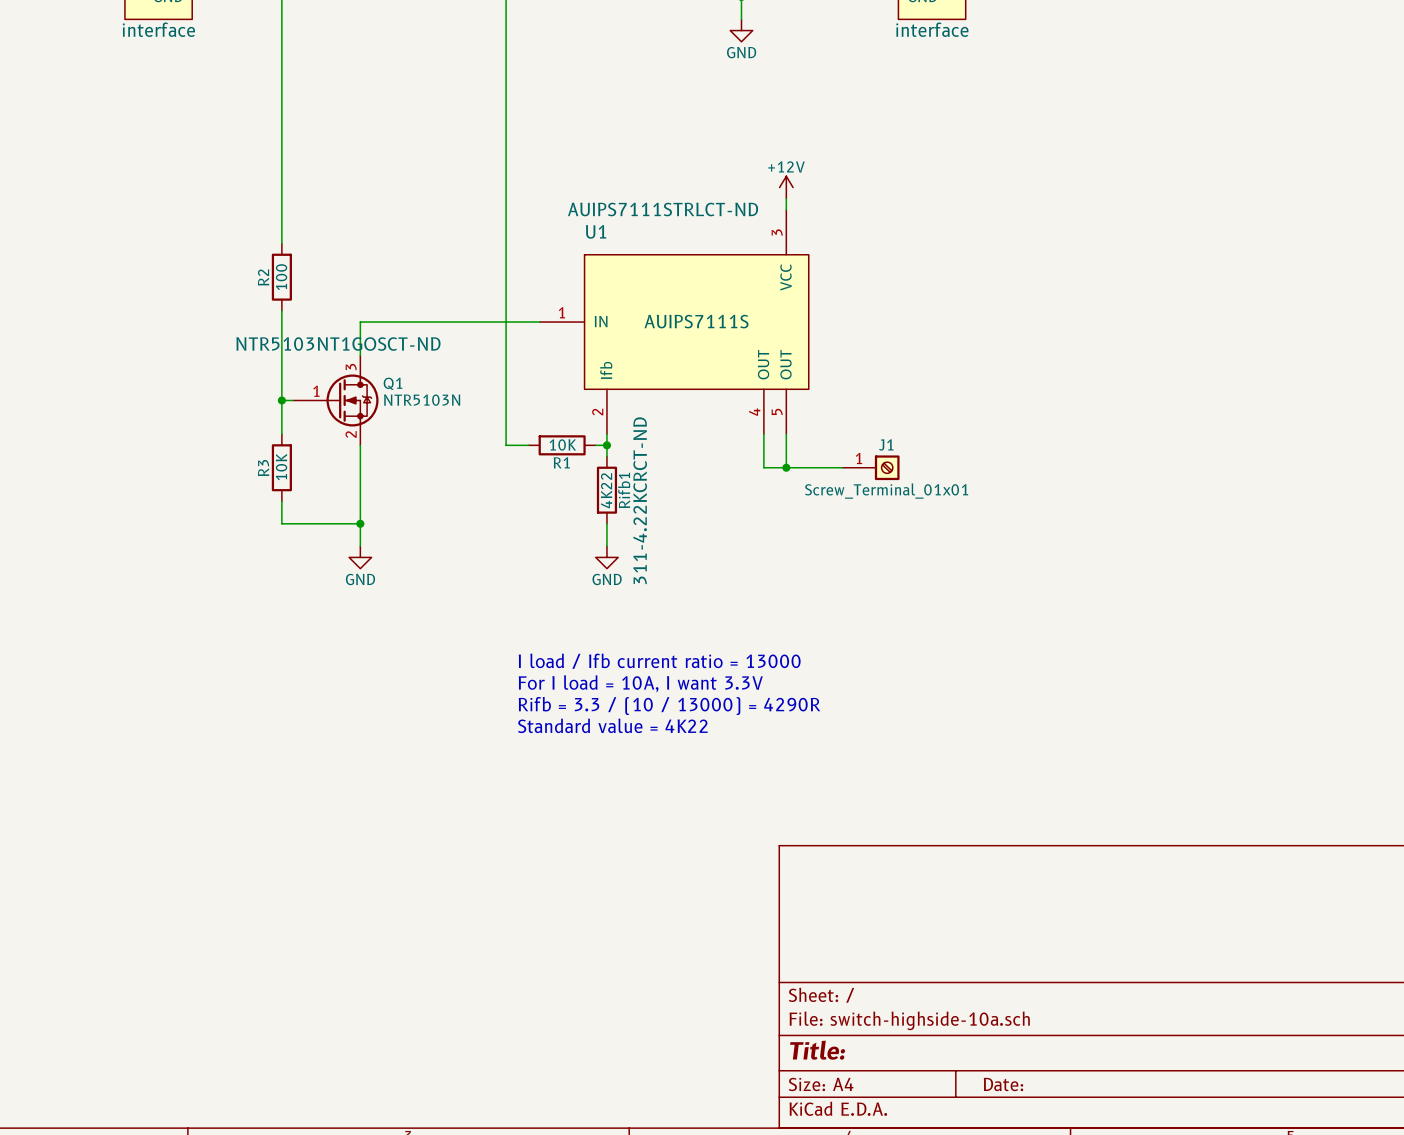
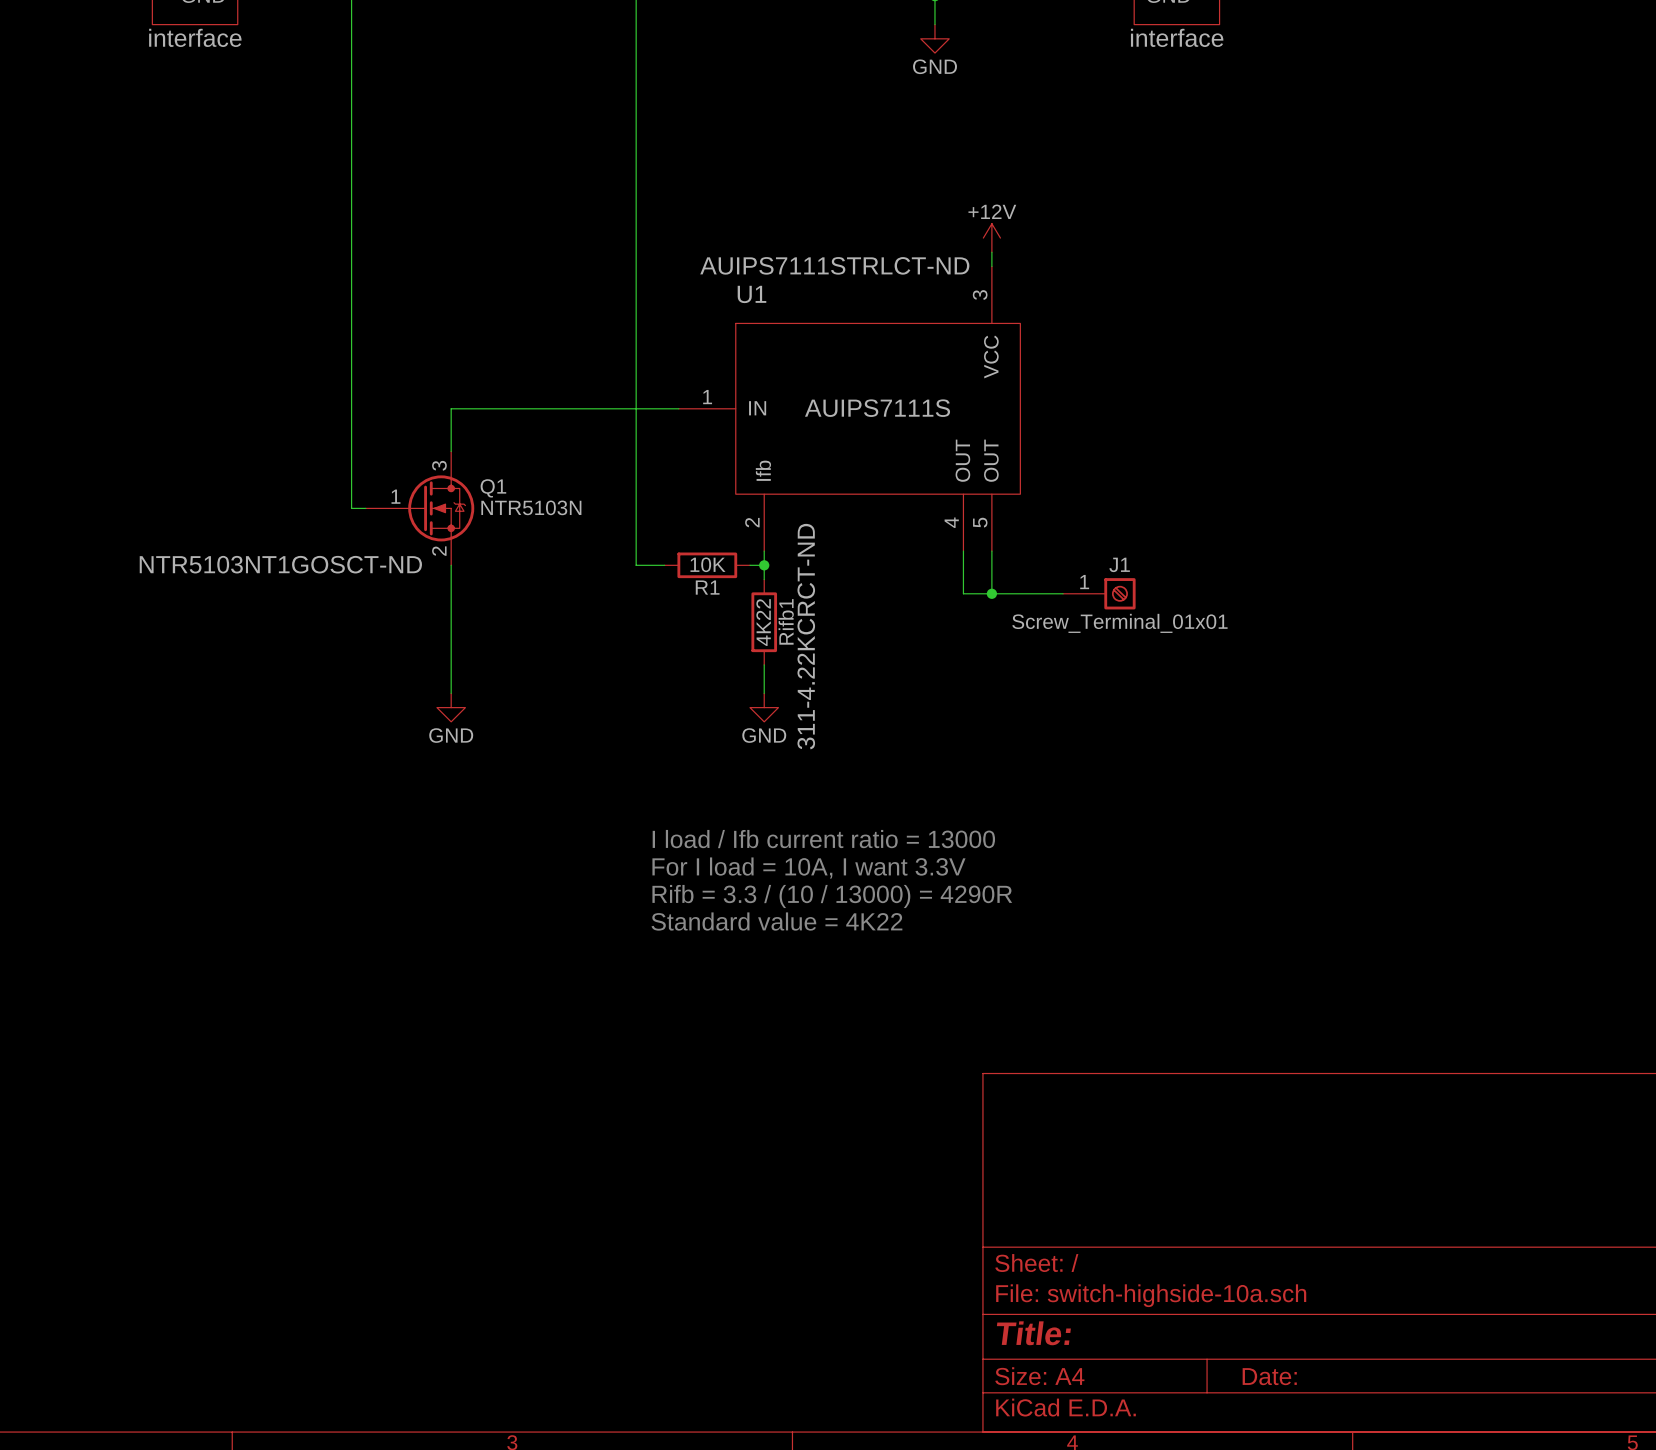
wire: none -> (351, 309) (351, 394)
R2: 100 (281, 277) -> none
Q1 text position: NTR5103NT1GOSCT-ND (338, 344) -> NTR5103NT1GOSCT-ND (280, 564)
wire: (281, 400) (281, 434) -> none
junction: (281, 400) -> none
R3: 10K (281, 467) -> none
wire: (281, 501) (281, 523) (360, 523) -> none
junction: (360, 523) -> none

